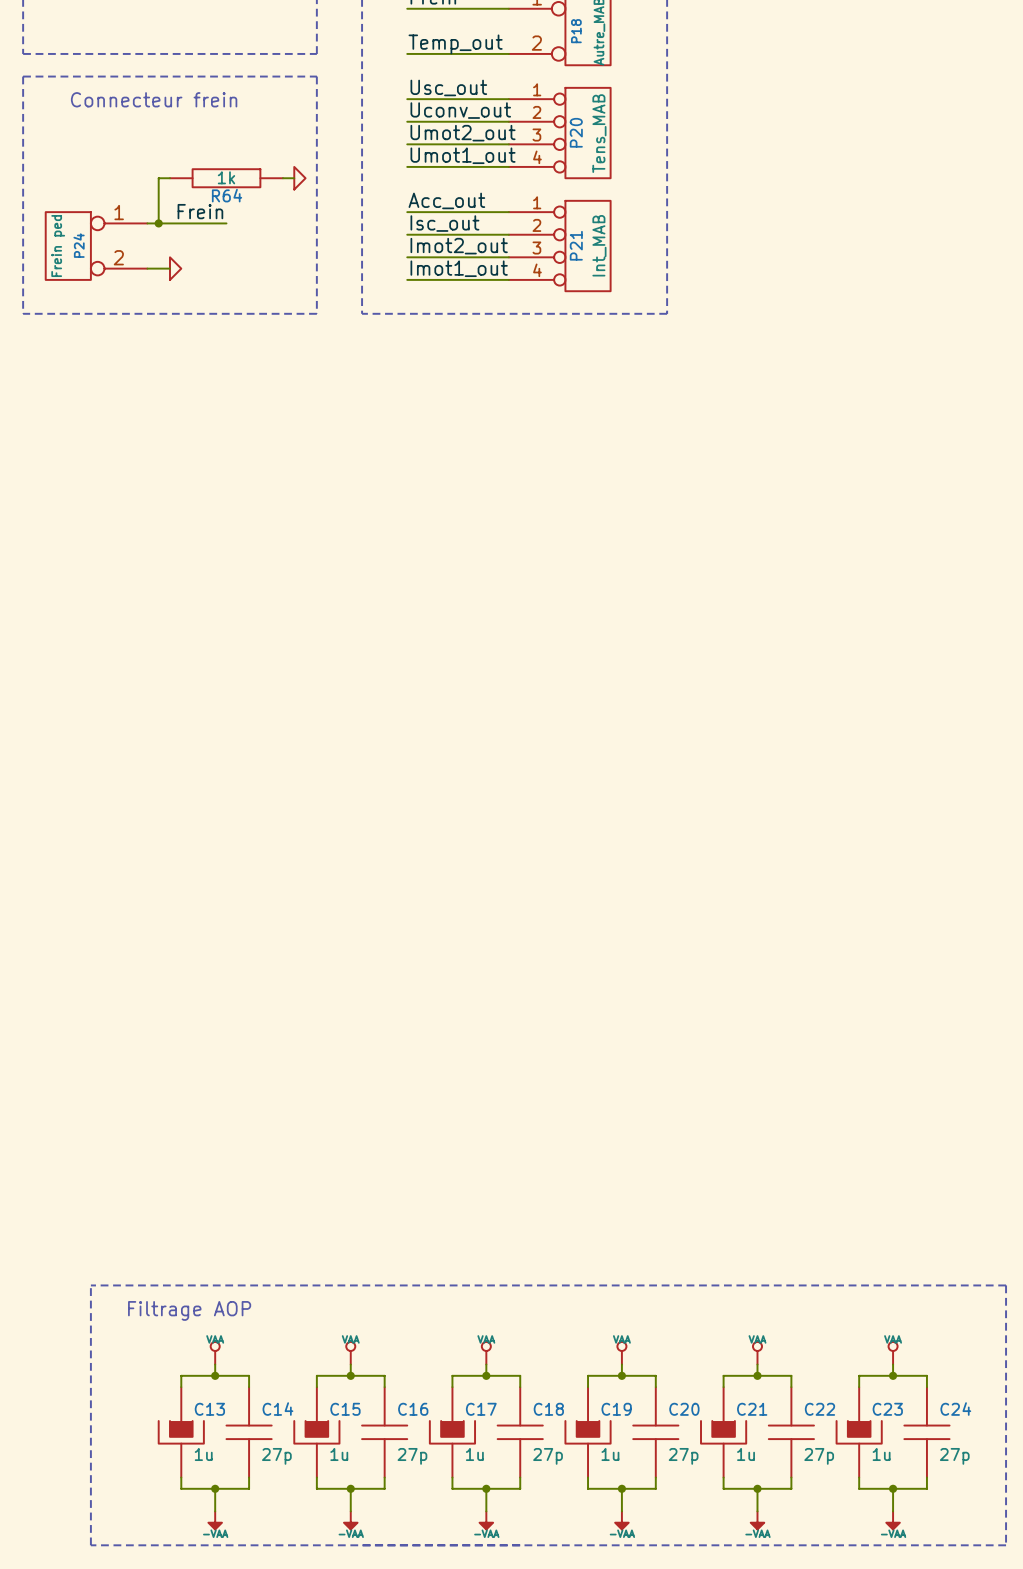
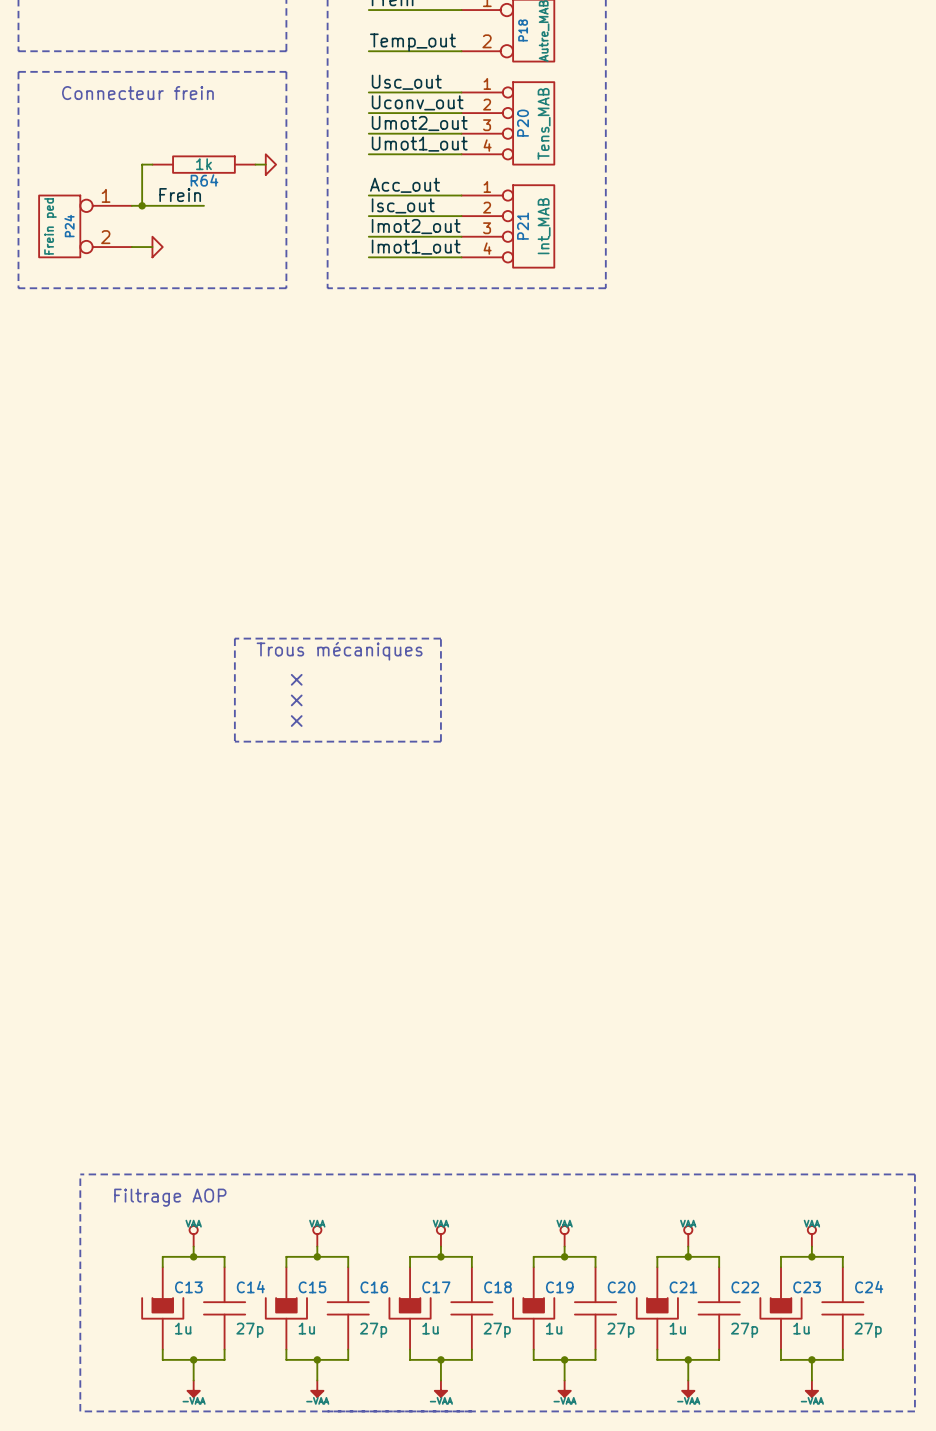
line: none -> (234, 638) (440, 638) (440, 741) (234, 741) (234, 638)
text: none -> Trous mécaniques (339, 651)
no-connect mark: none -> (296, 679)
no-connect mark: none -> (296, 700)
no-connect mark: none -> (296, 721)

